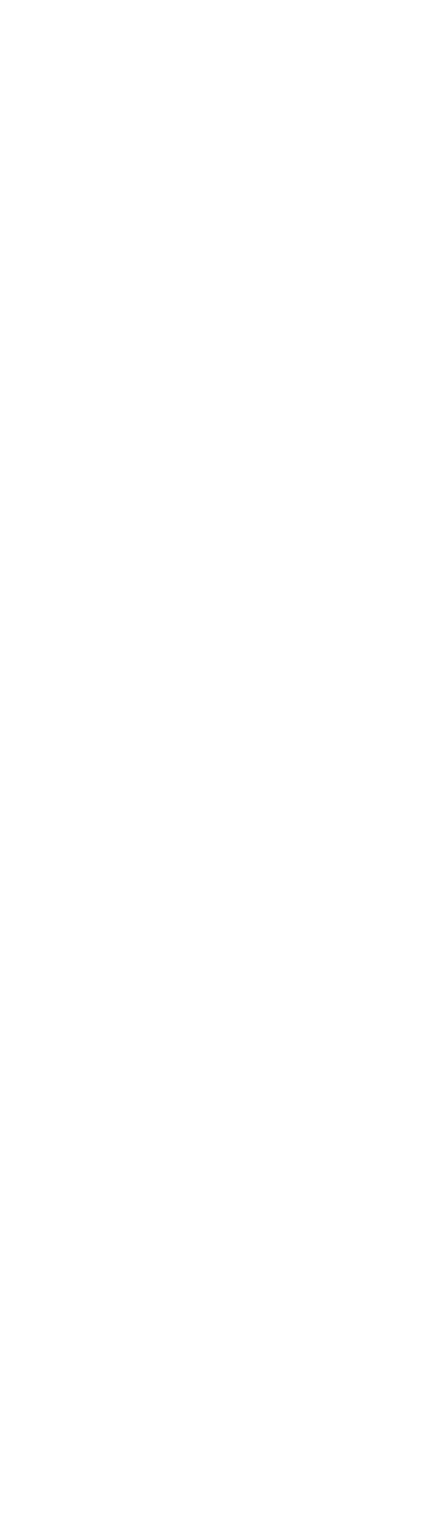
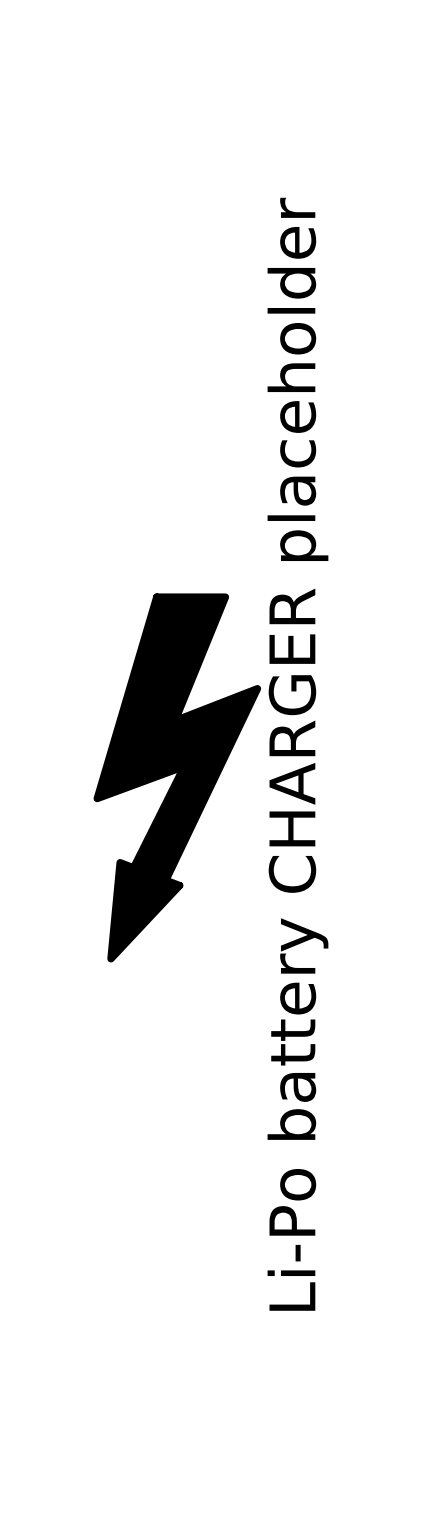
part: none -> Li-Po battery CHARGER placeholder (177, 777)

